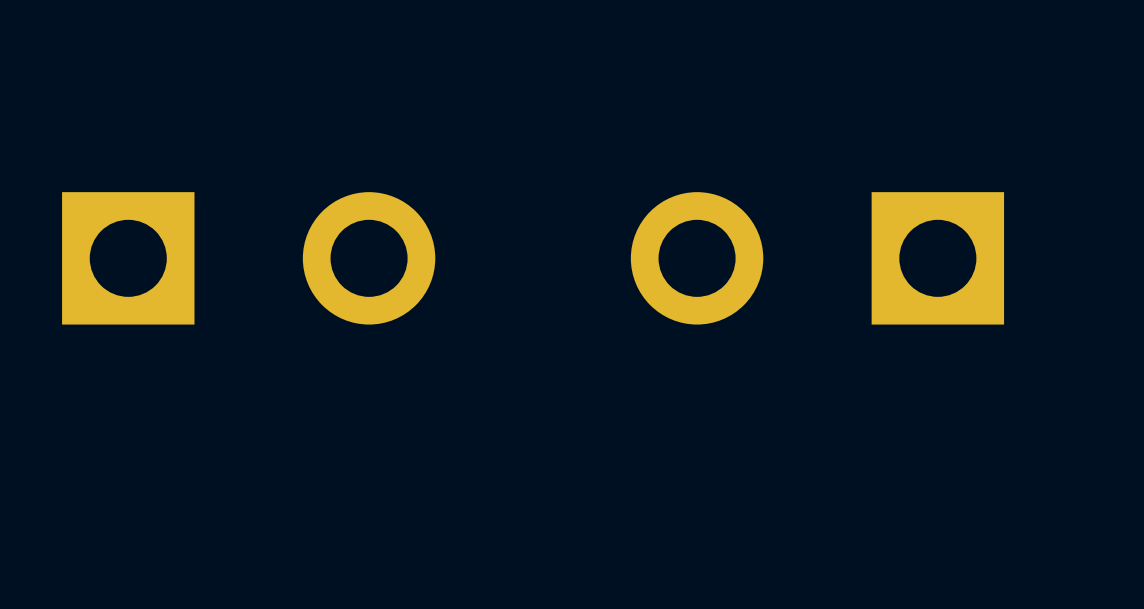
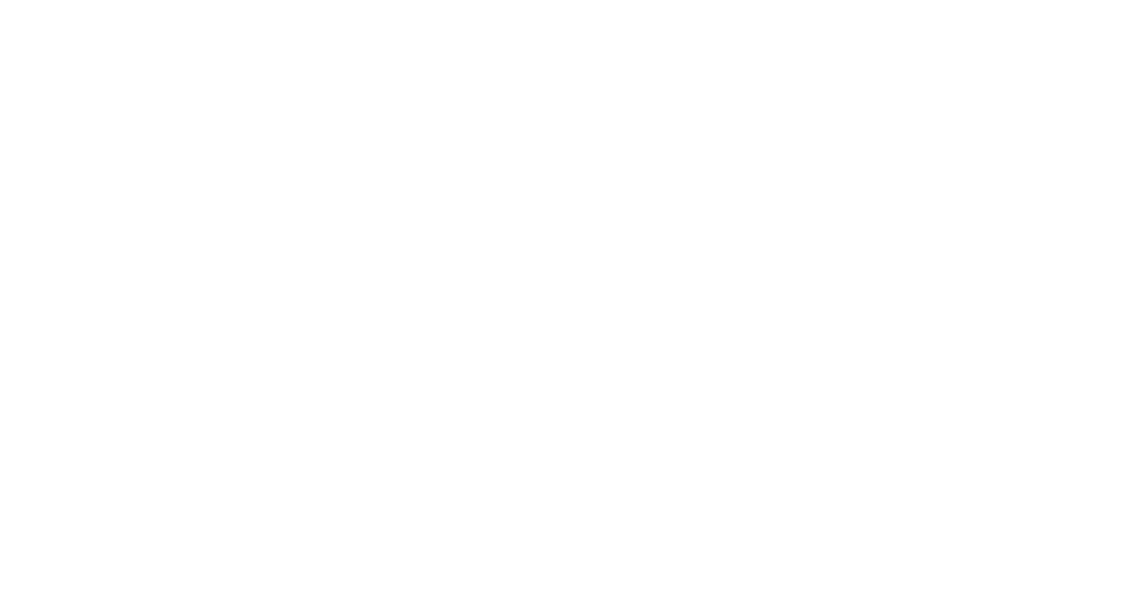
part: (248, 258) -> none
part: (817, 258) -> none

